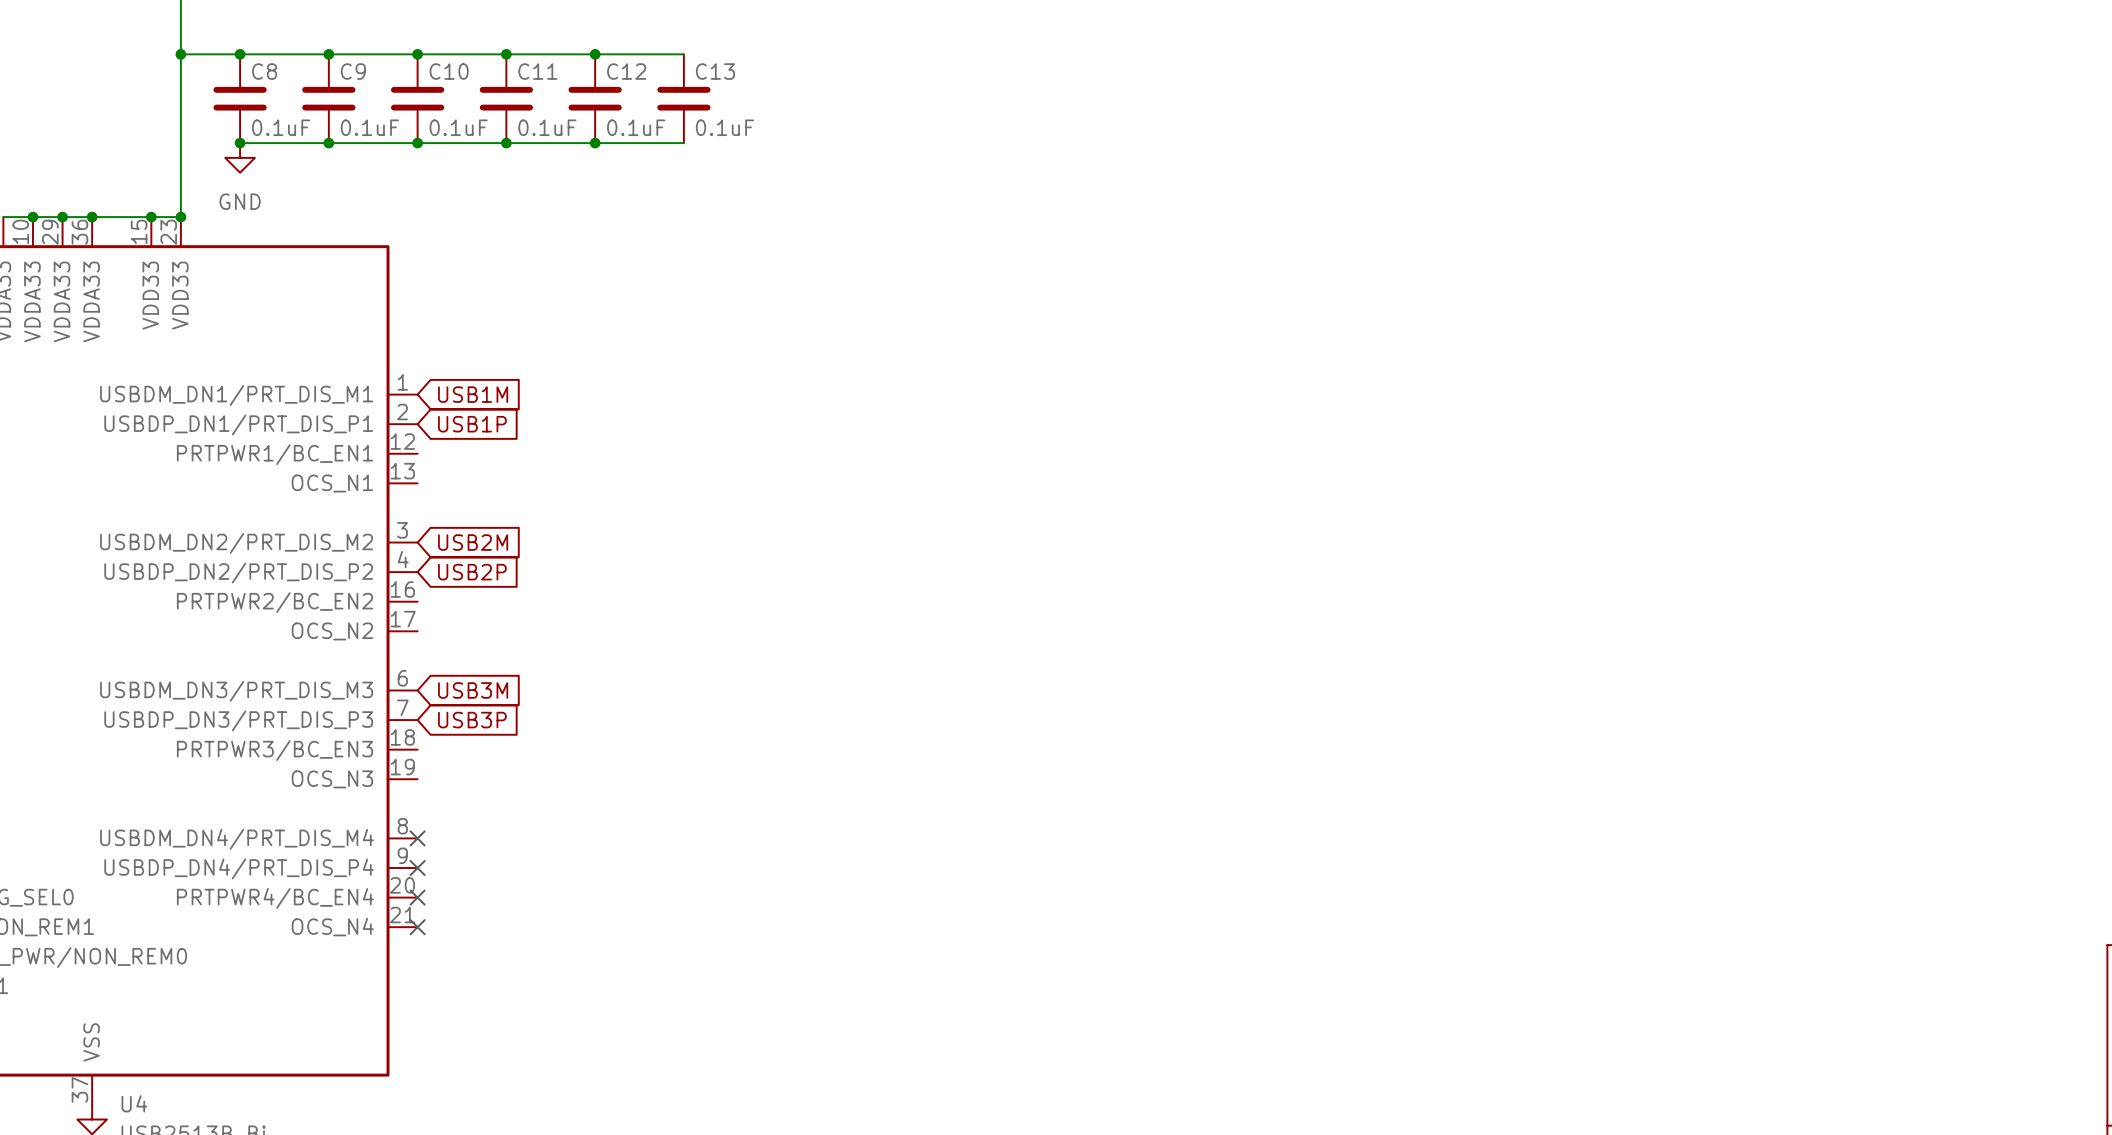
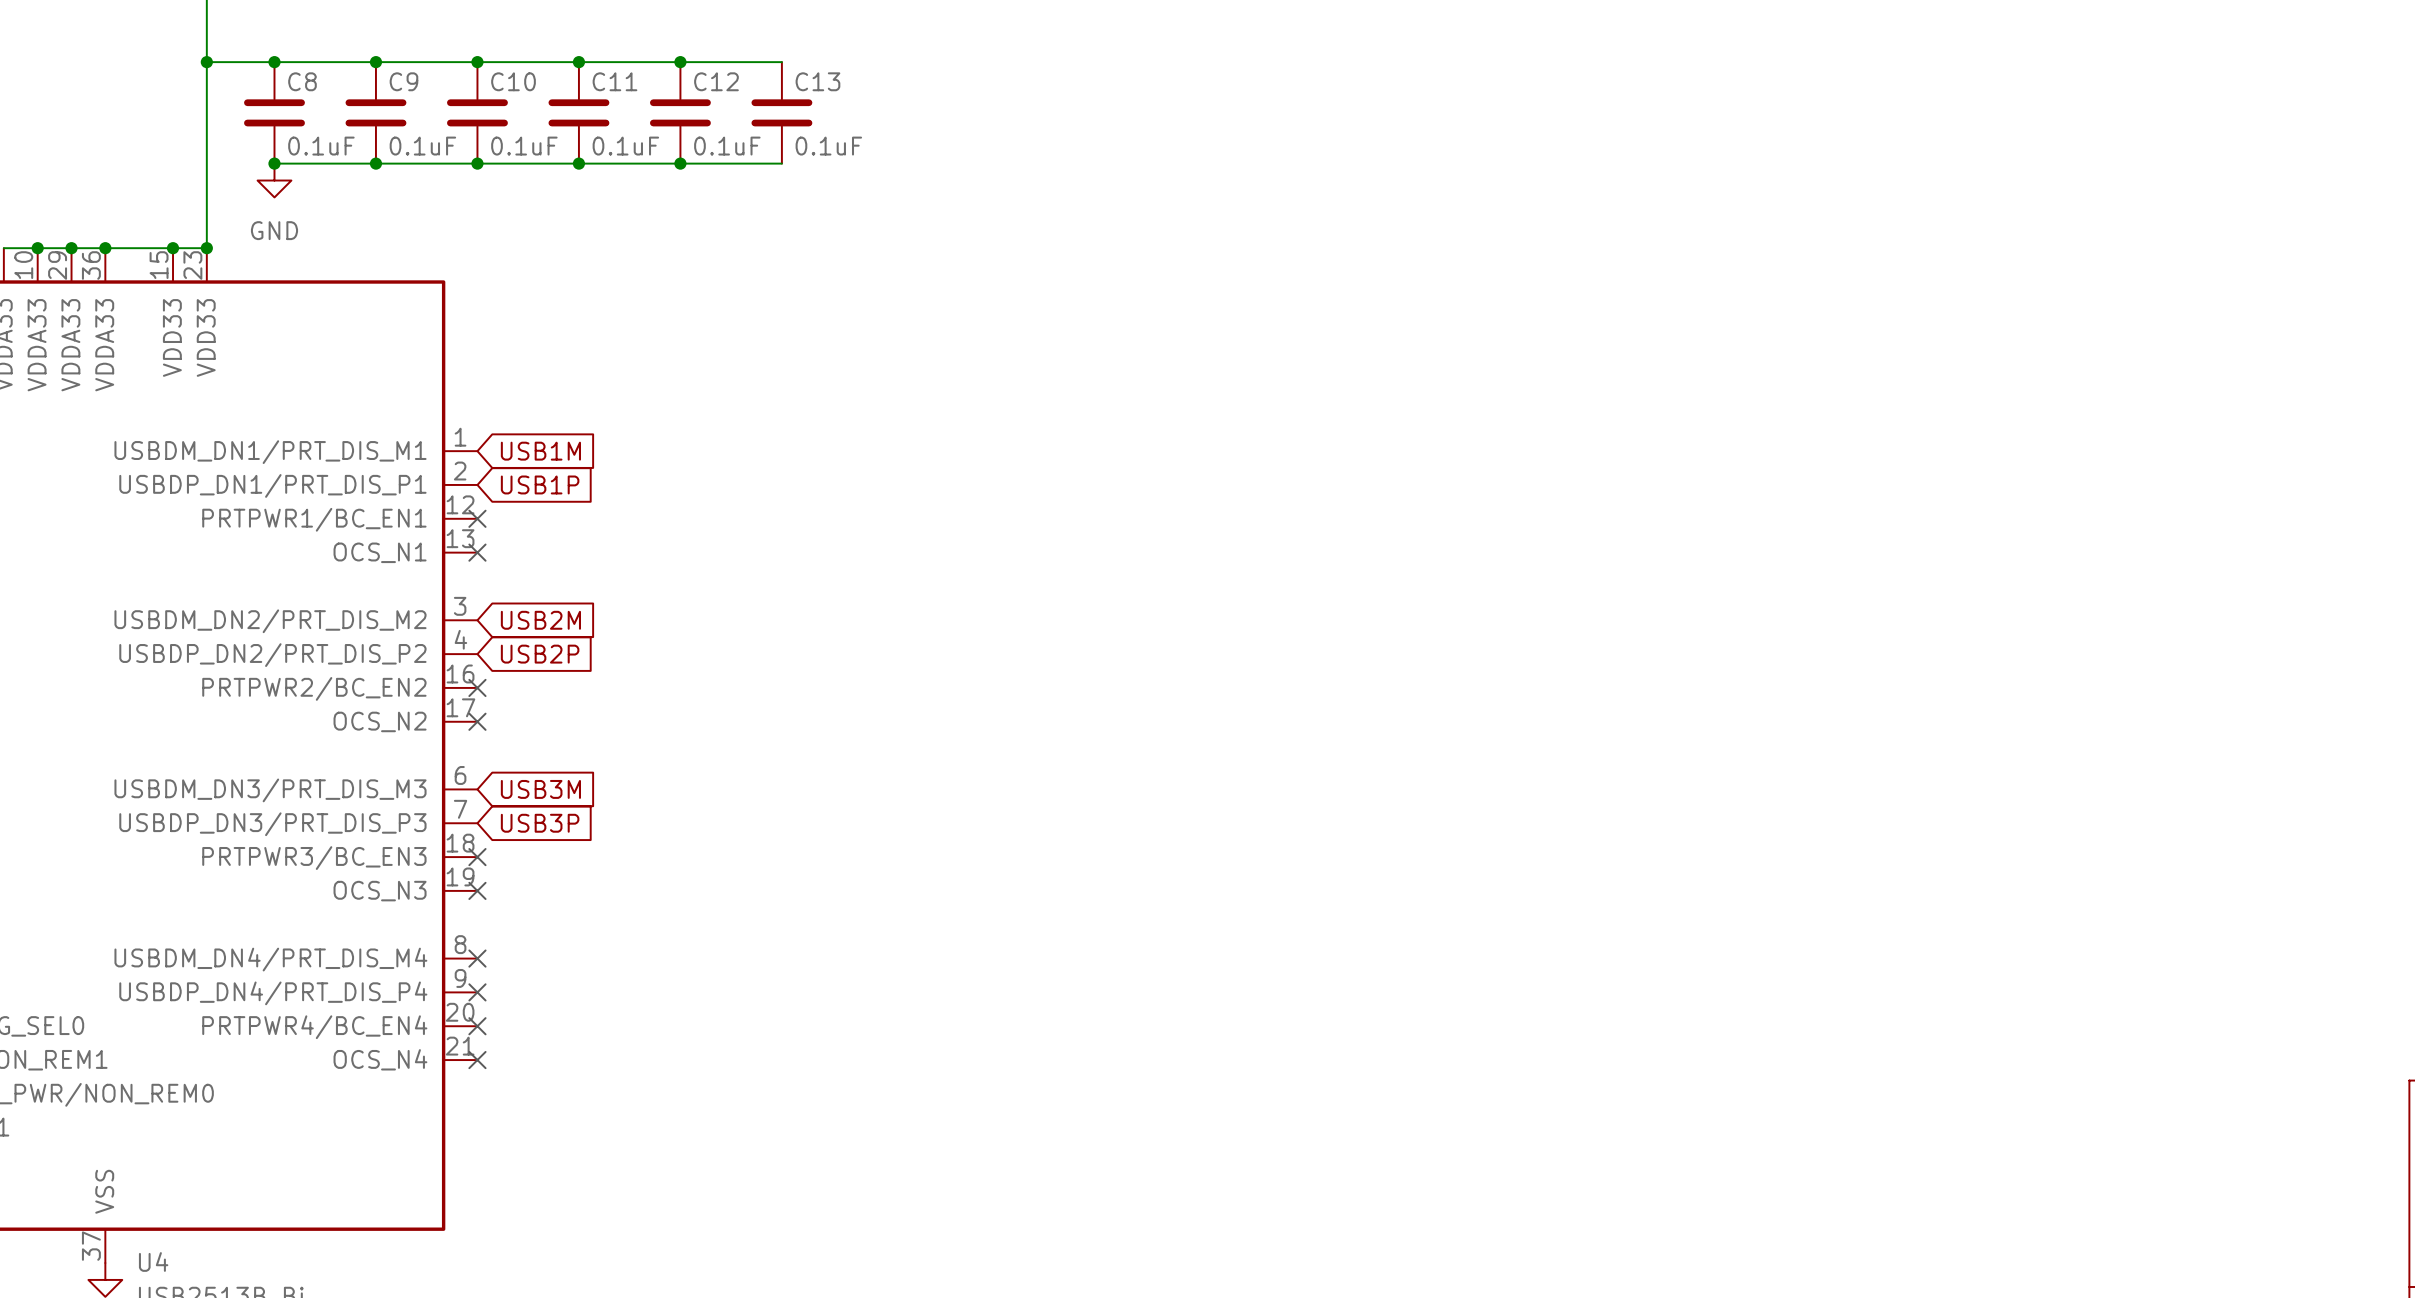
no-connect mark: none -> (477, 518)
no-connect mark: none -> (477, 552)
no-connect mark: none -> (477, 687)
no-connect mark: none -> (477, 721)
no-connect mark: none -> (477, 857)
no-connect mark: none -> (477, 890)

